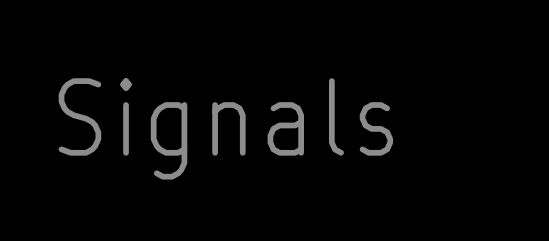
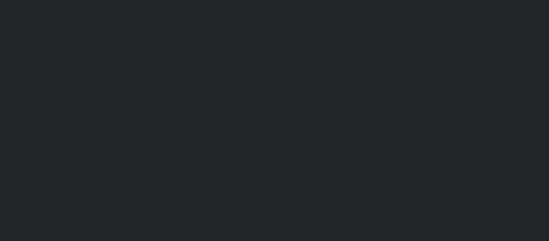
text: Signals (225, 128) -> none

